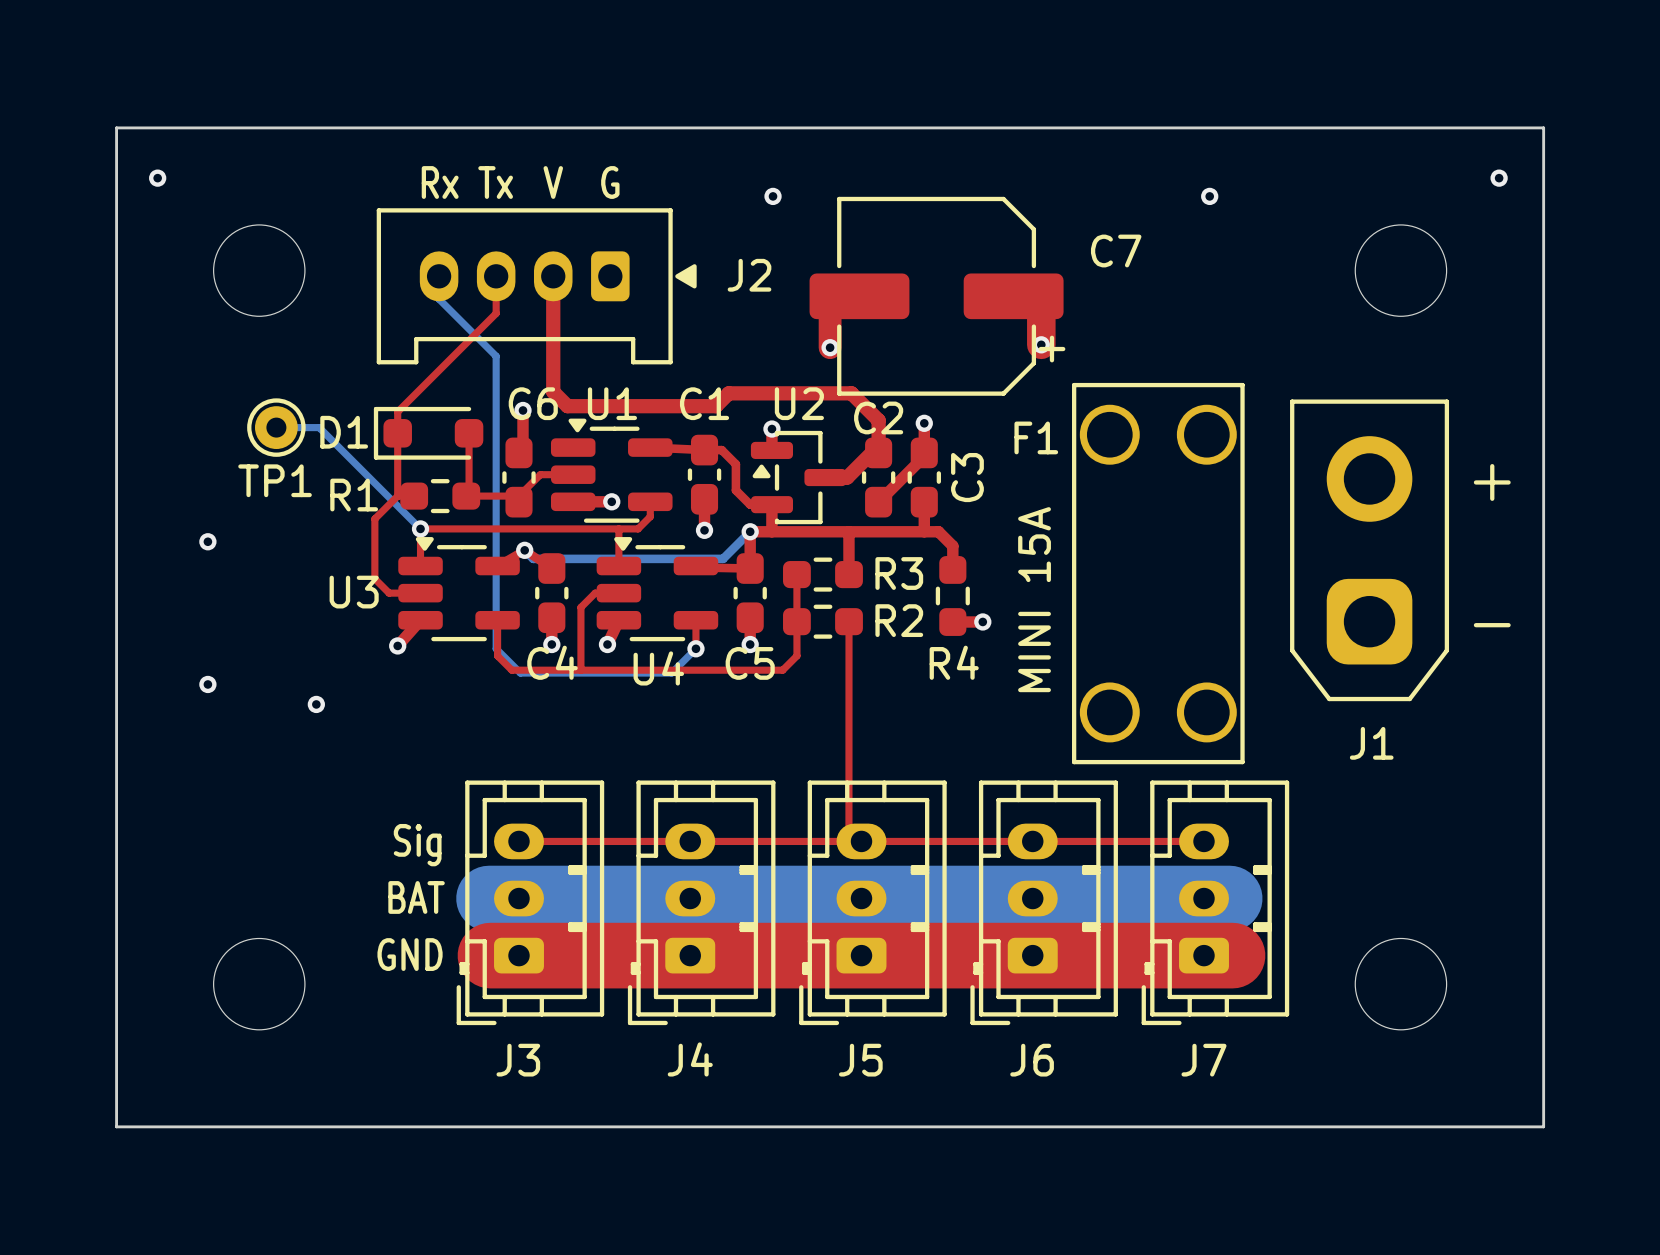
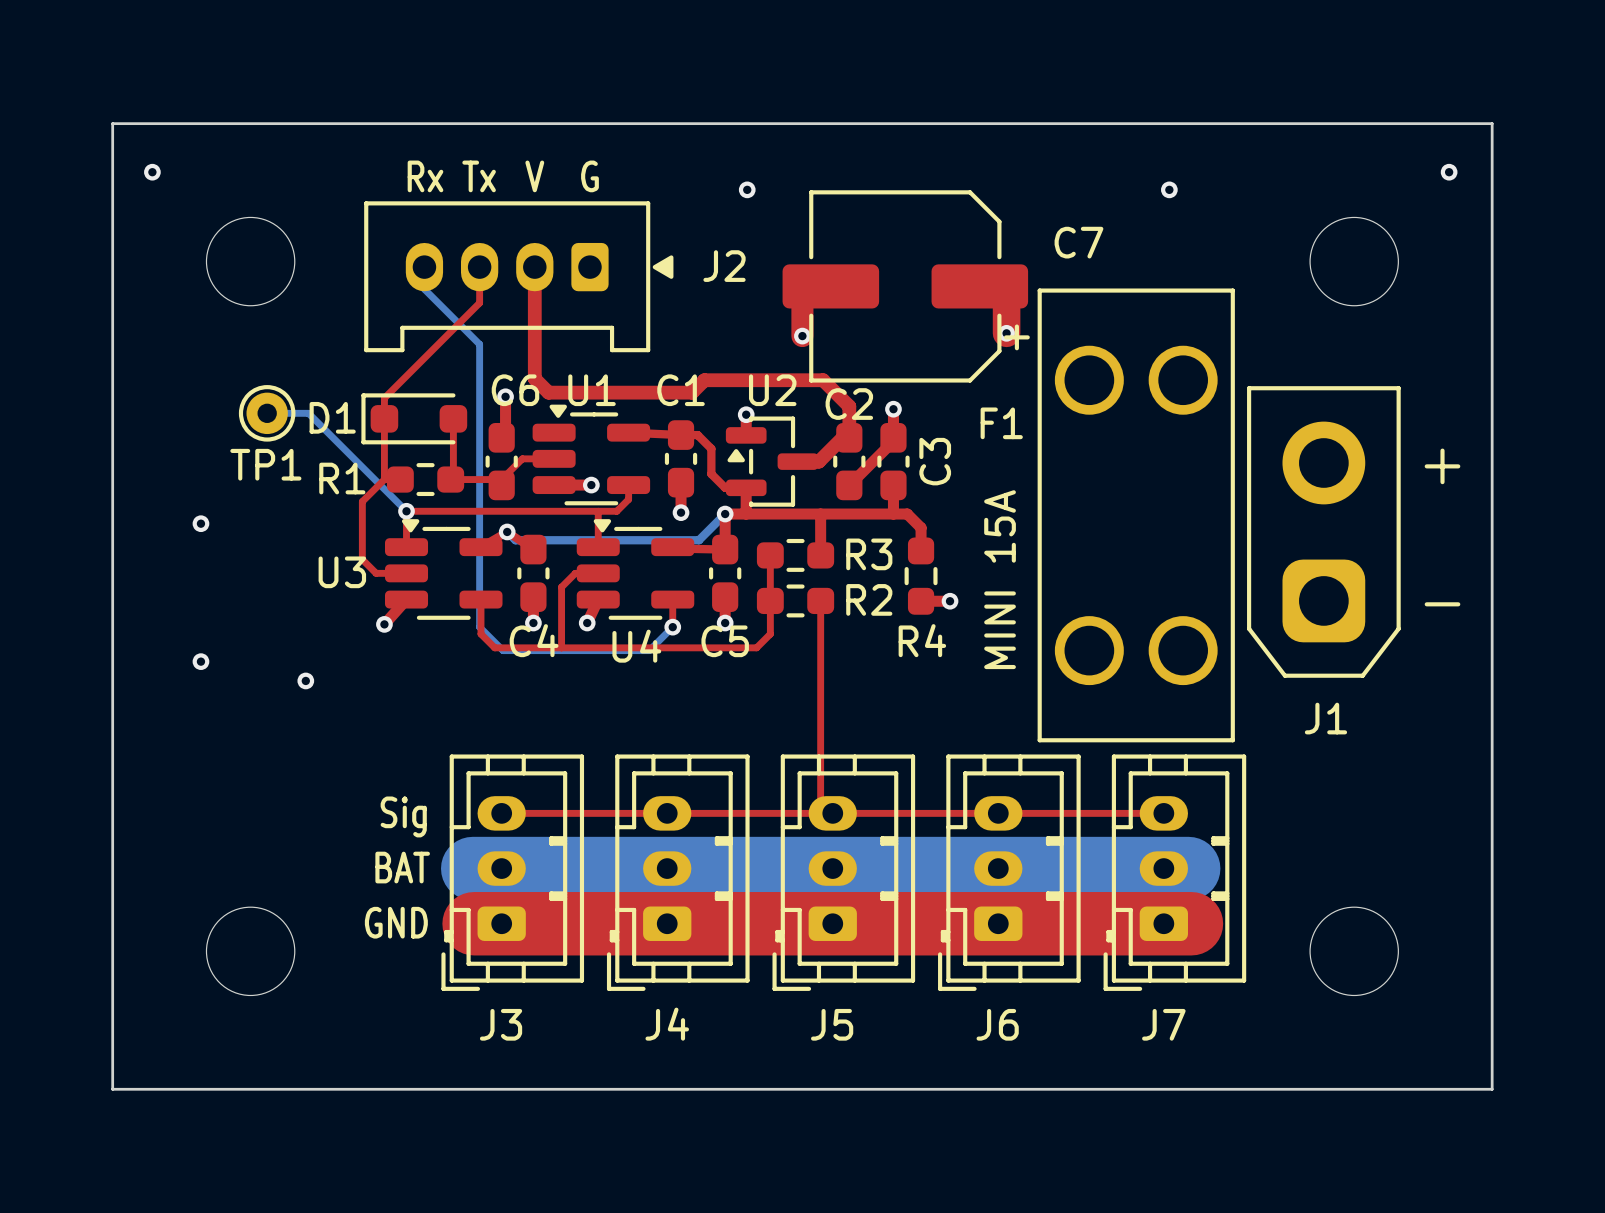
F1 footprint: [1071, 382, 1245, 765] -> [1037, 288, 1235, 743]

